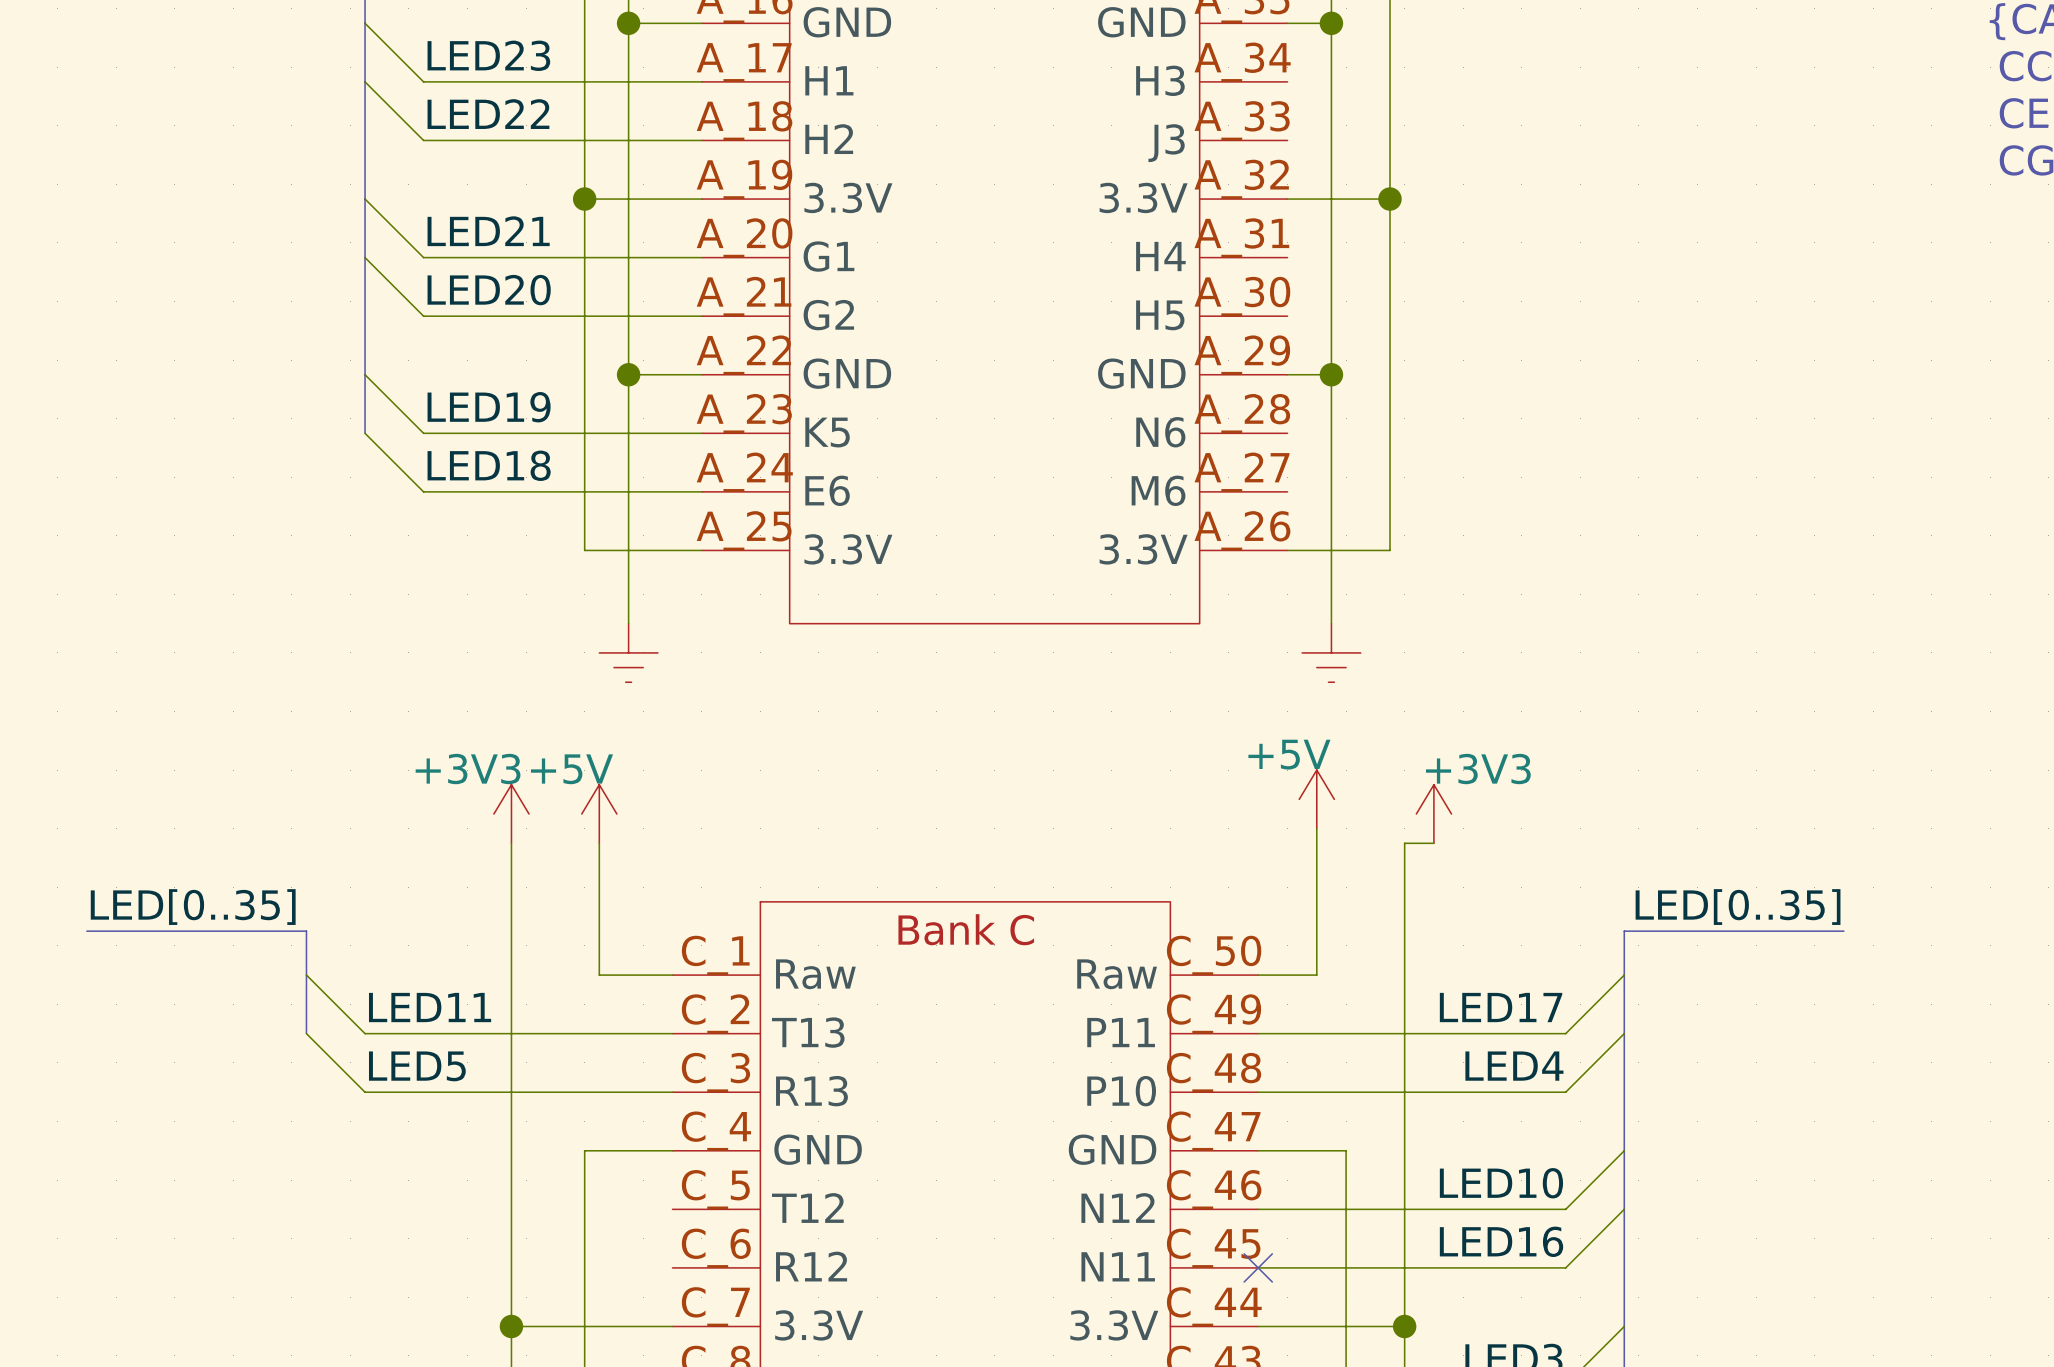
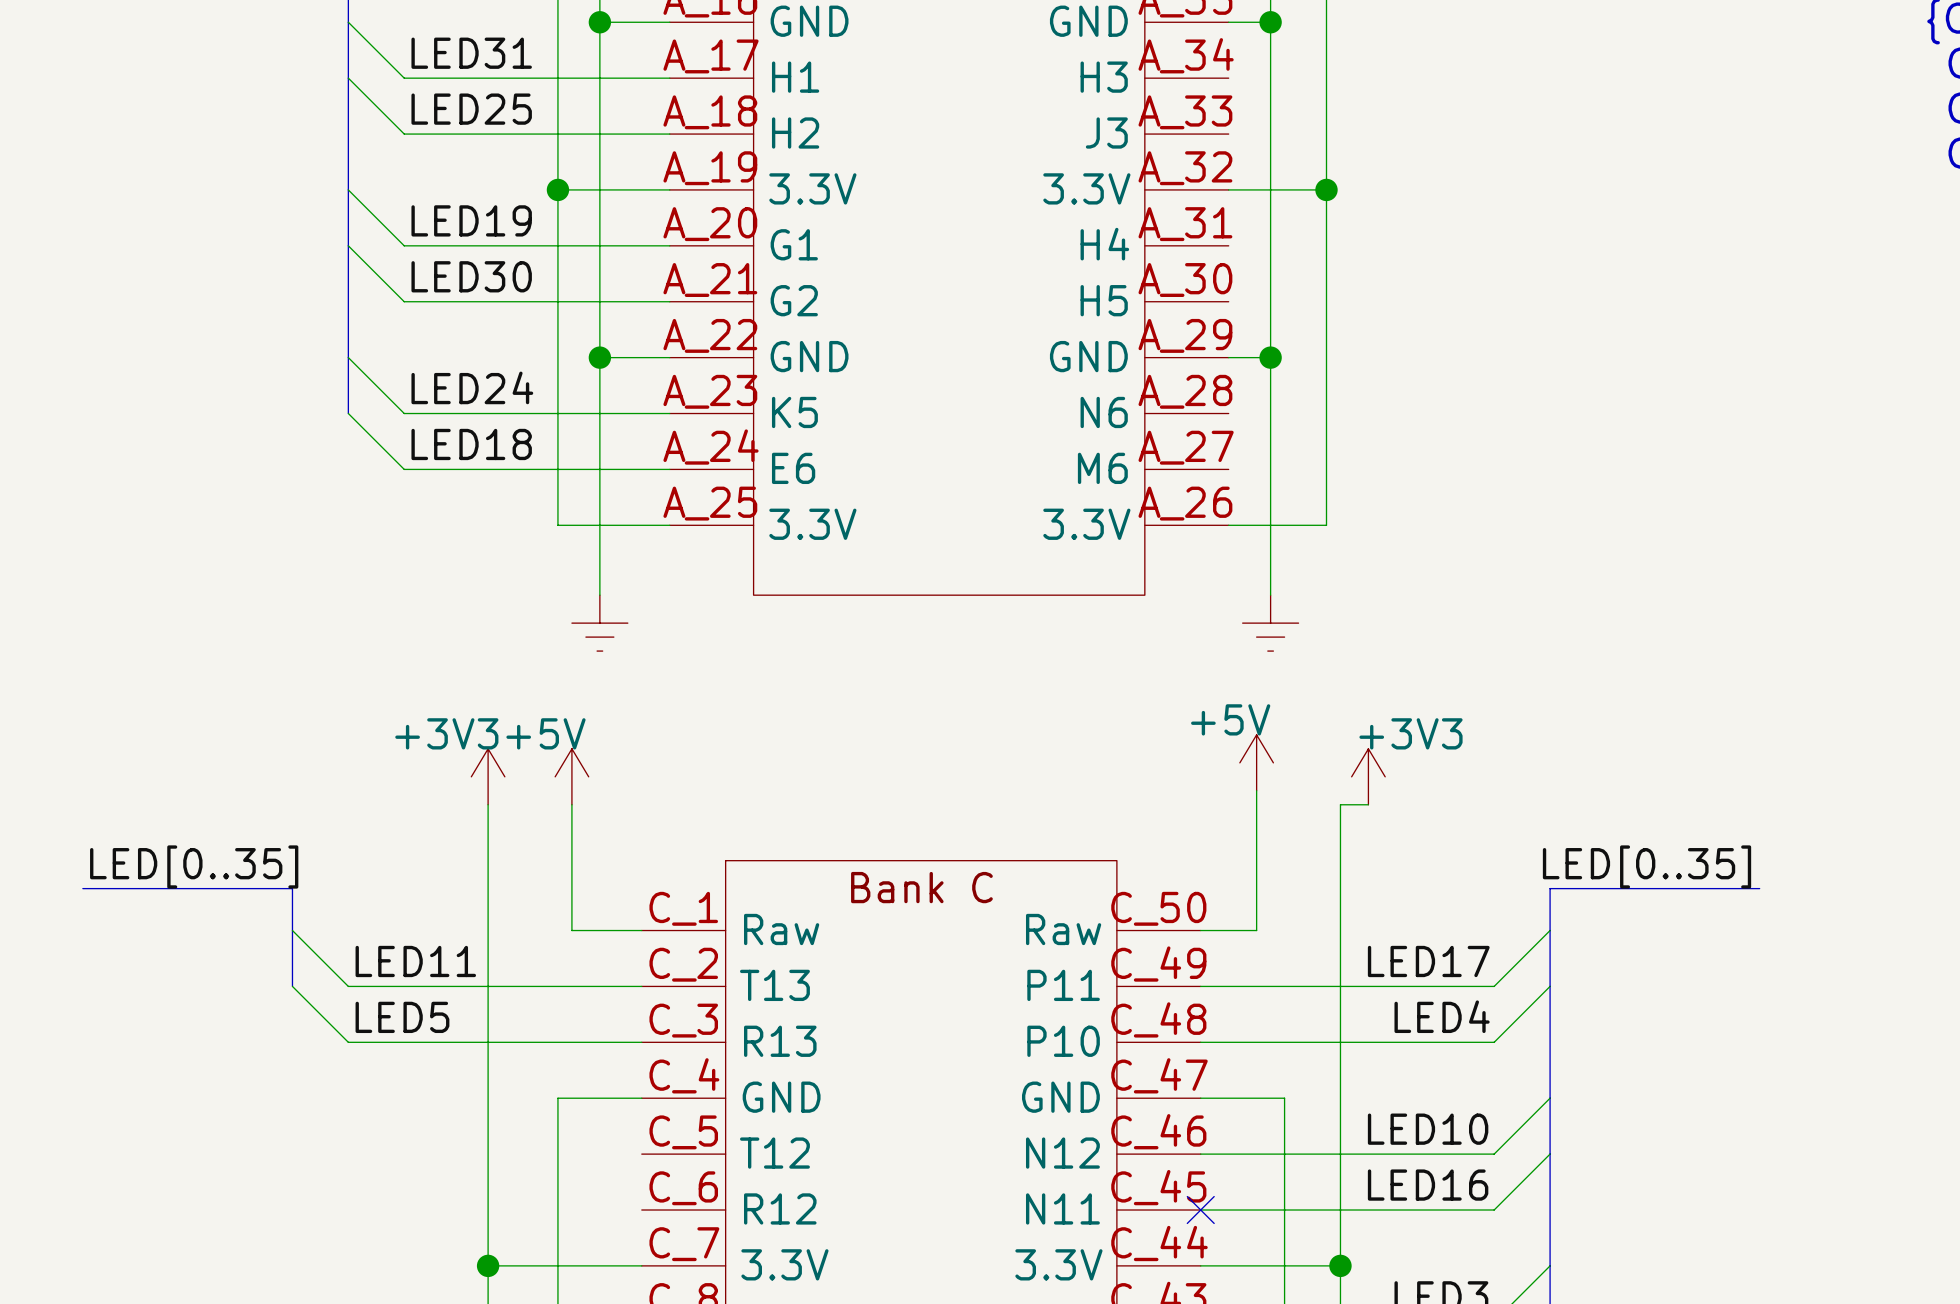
label: LED23 (488, 55) -> LED31 (471, 53)
label: LED22 (488, 114) -> LED25 (471, 109)
label: LED21 (488, 231) -> LED19 (471, 220)
label: LED20 (489, 290) -> LED30 (471, 276)
label: LED19 (489, 407) -> LED24 (472, 387)

